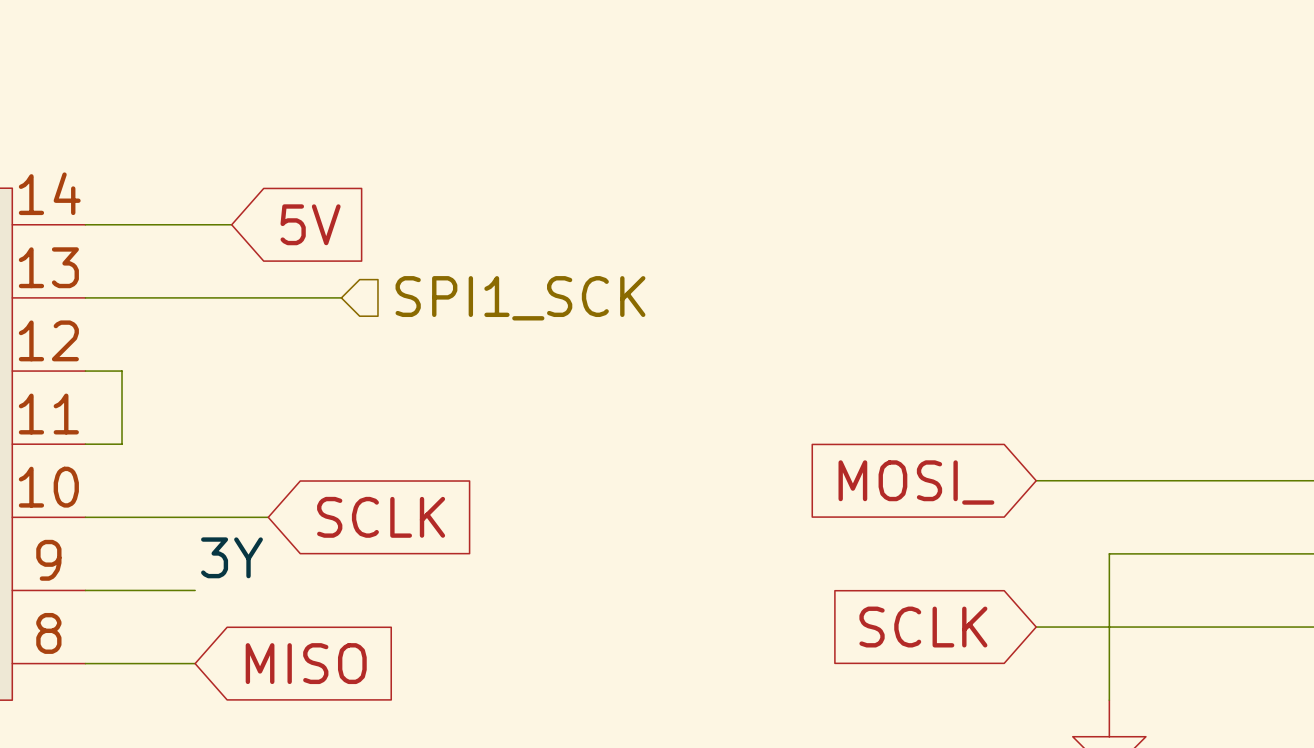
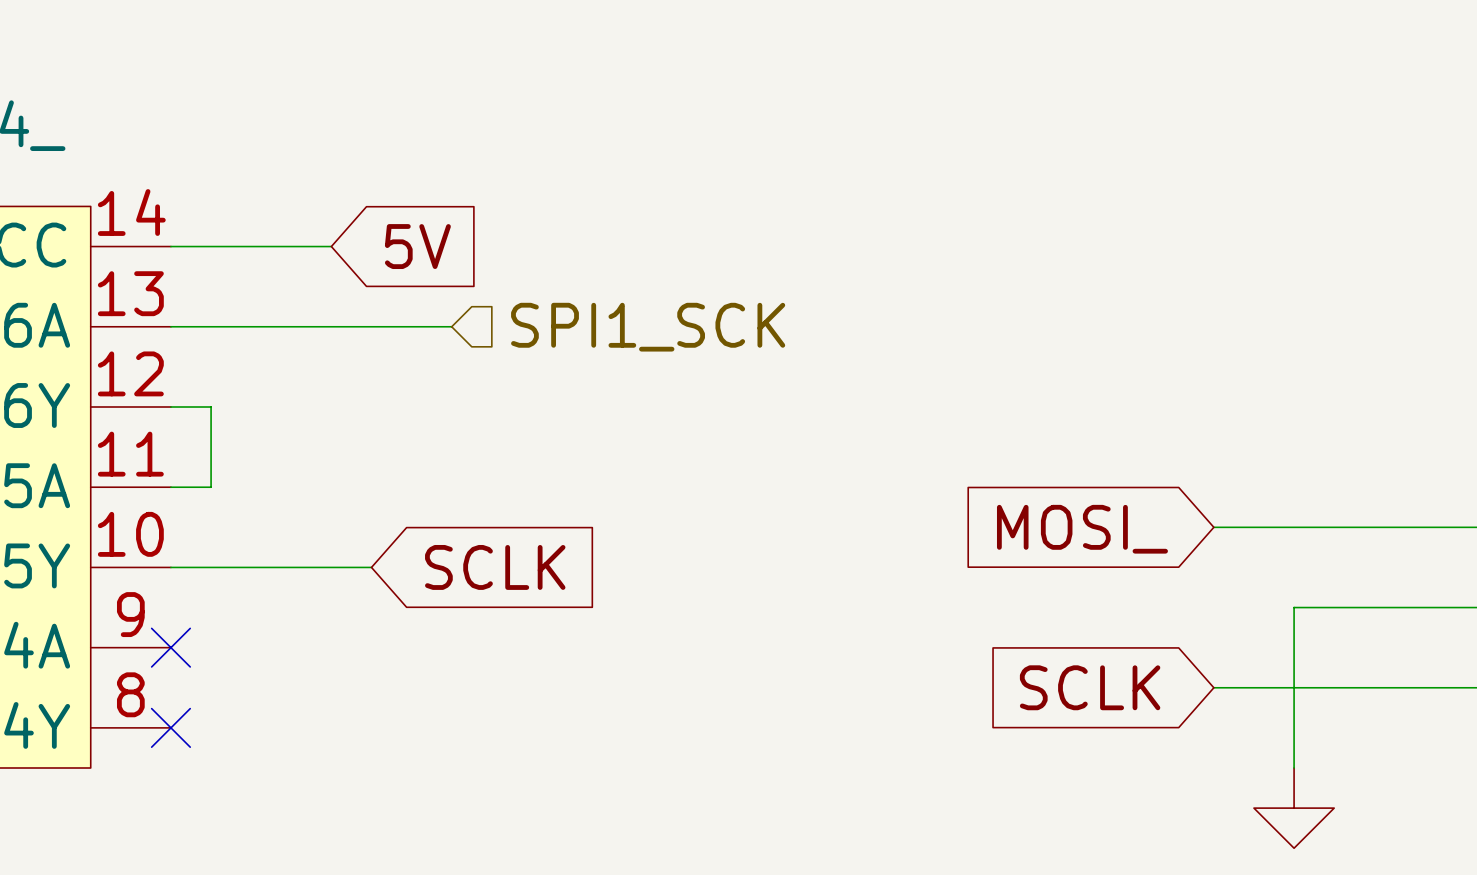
label: 3Y (231, 557) -> none
wire: (85, 590) (195, 590) -> none
no-connect mark: none -> (170, 647)
wire: (85, 663) (195, 663) -> none
no-connect mark: none -> (170, 727)
global label: MISO (306, 663) -> none

